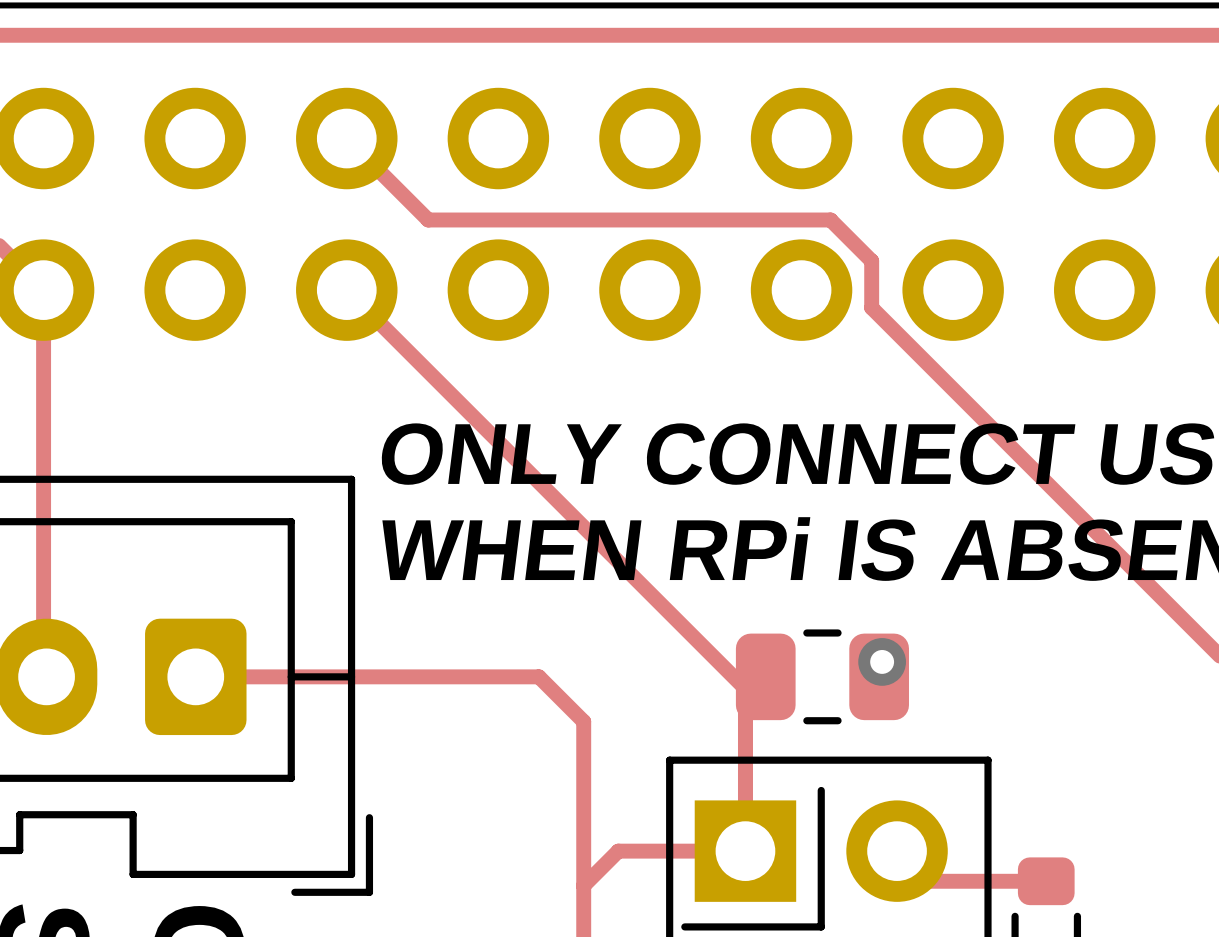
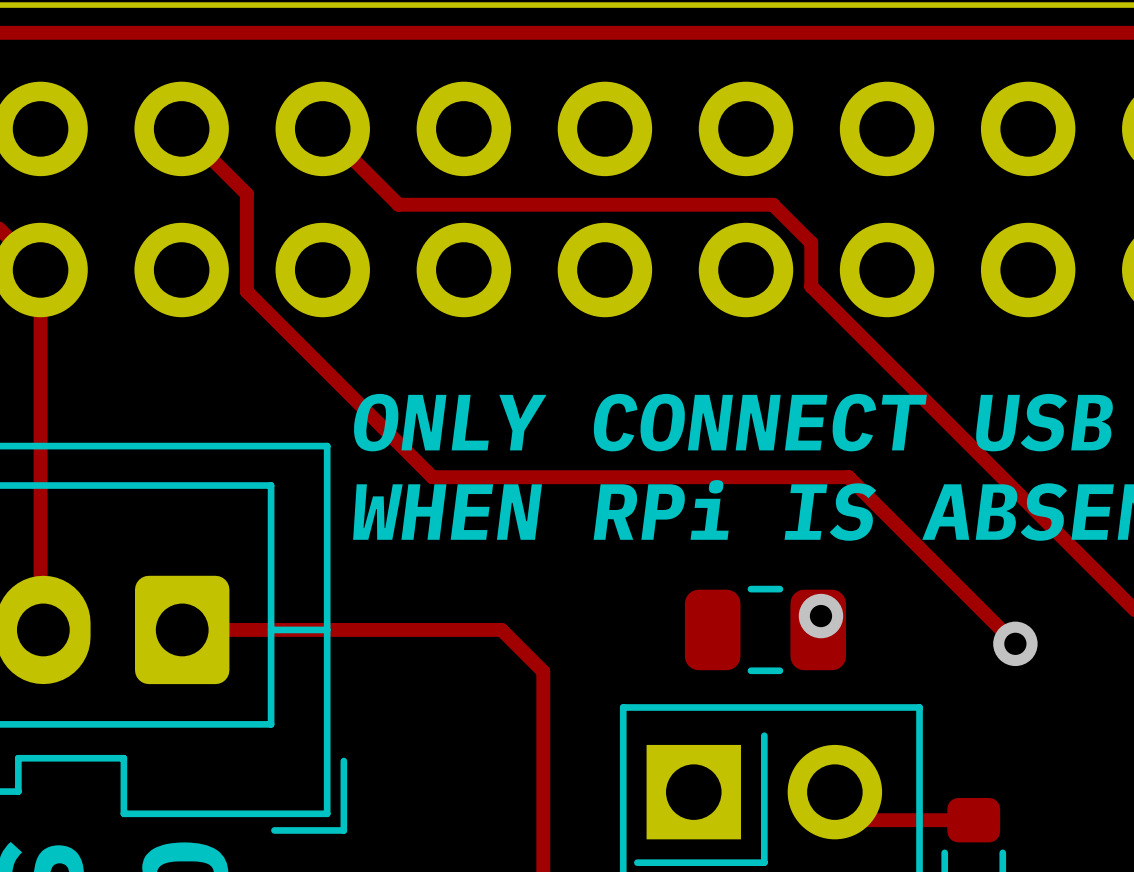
track: none -> (181, 128) (246, 194) (246, 291) (432, 477) (848, 477) (1015, 643)
track: (346, 290) (745, 688) (745, 851) (618, 851) (583, 885) -> none
via: none -> (1015, 643)

